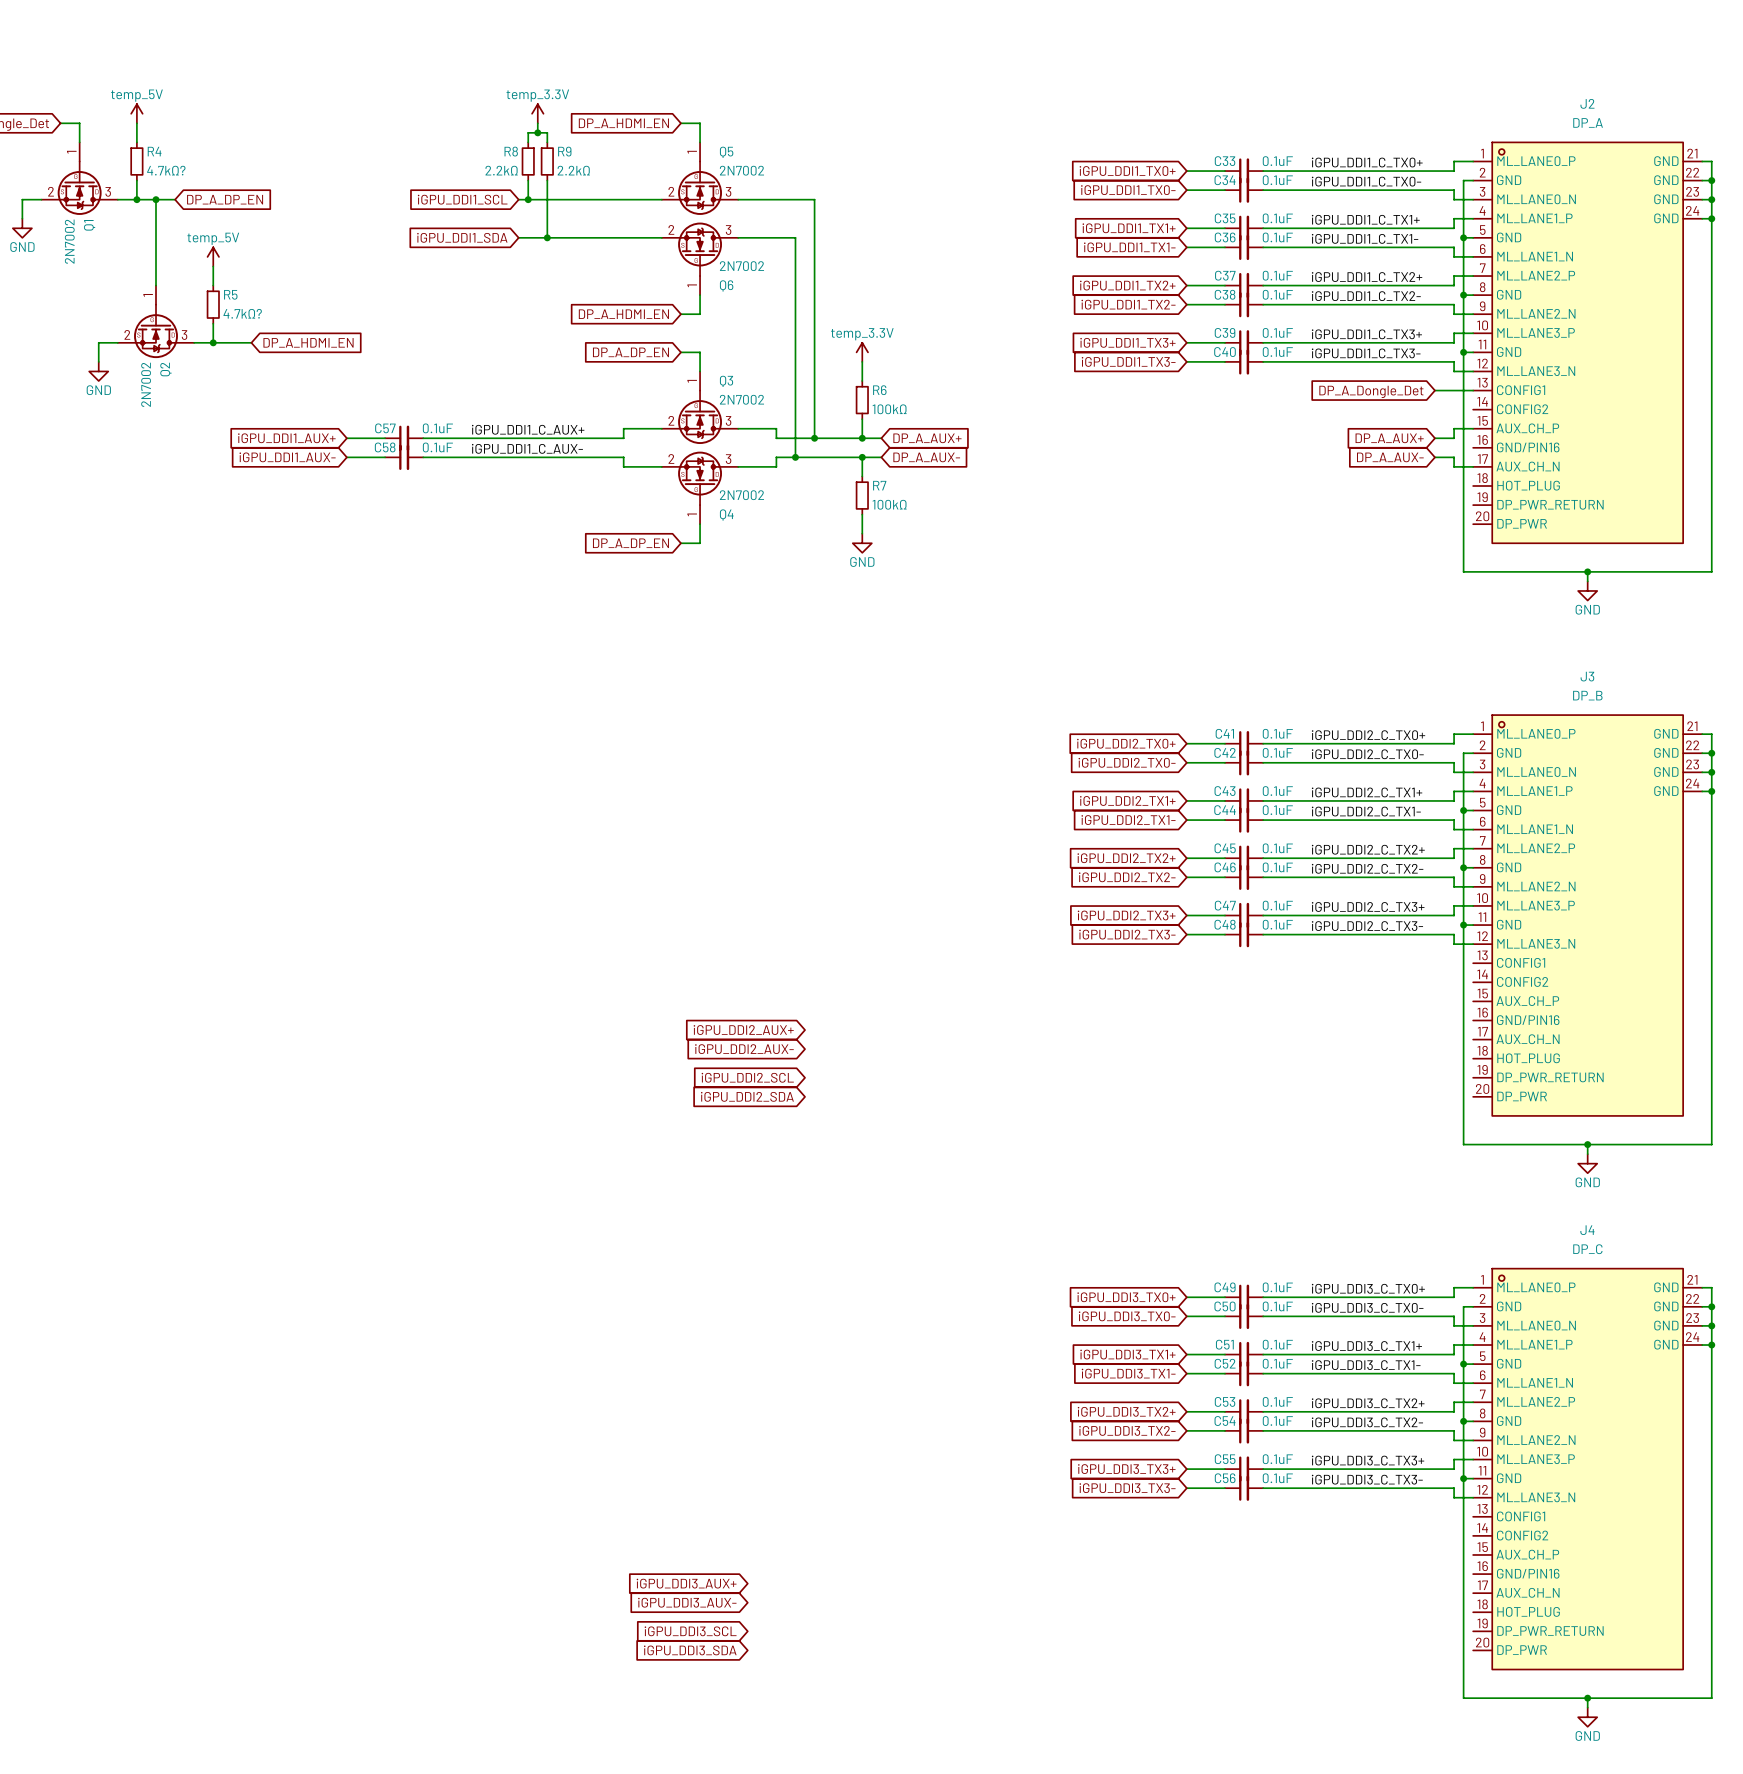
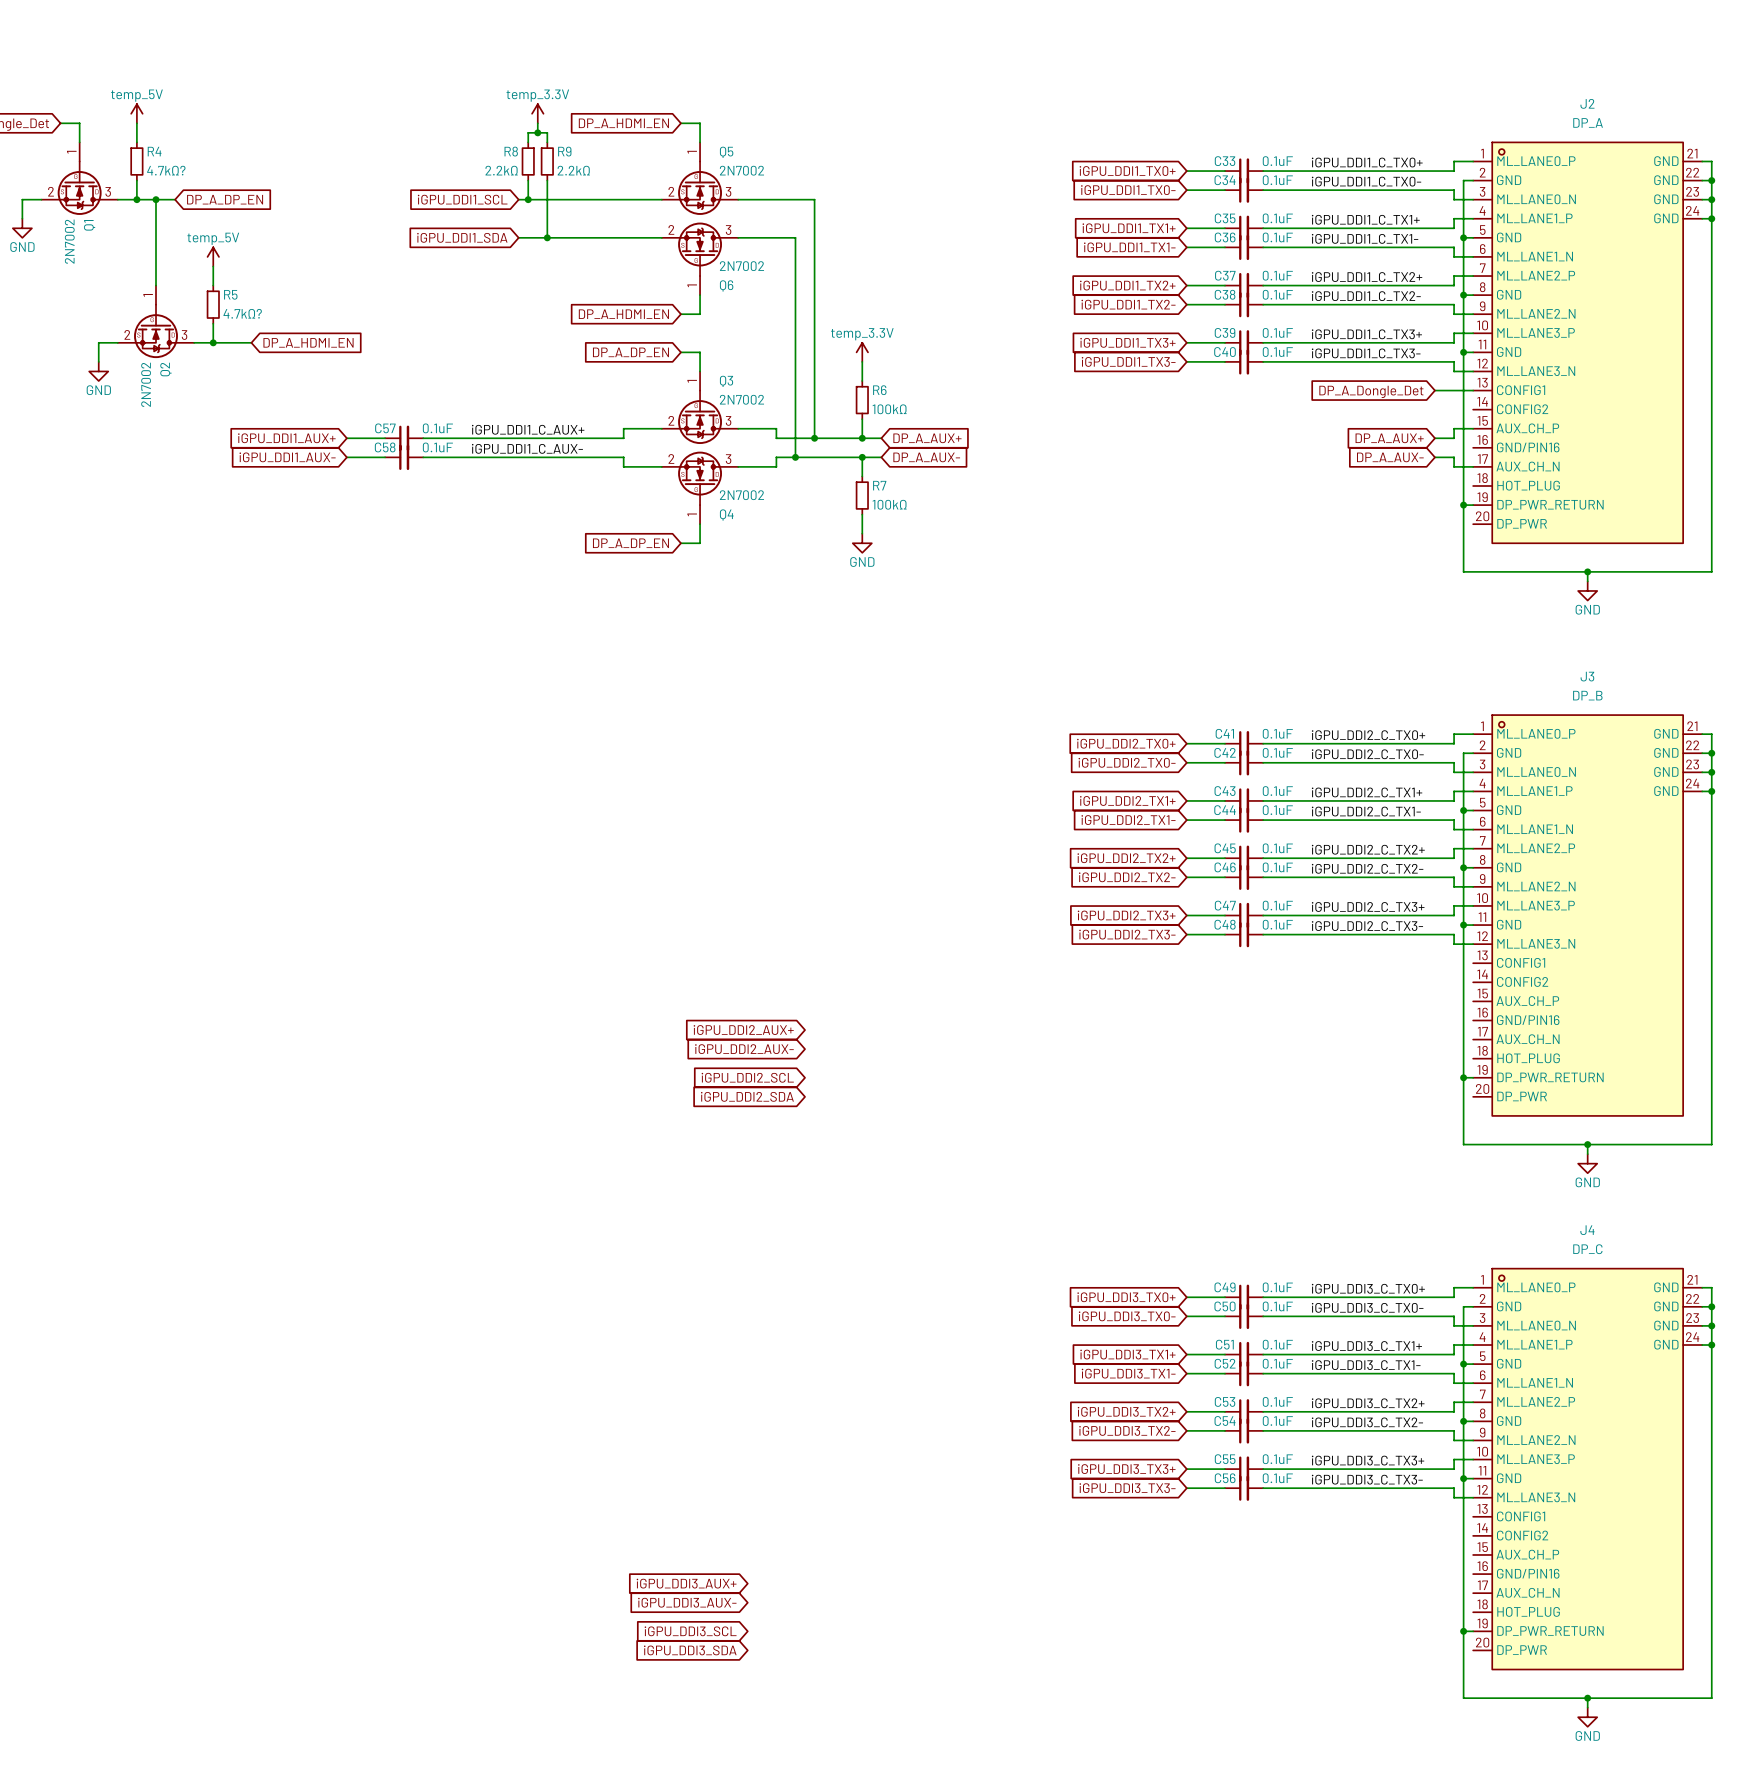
wire: none -> (1463, 505) (1473, 505)
junction: none -> (1463, 505)
wire: none -> (1463, 1077) (1473, 1077)
junction: none -> (1463, 1077)
wire: none -> (1463, 1631) (1473, 1631)
junction: none -> (1463, 1631)

